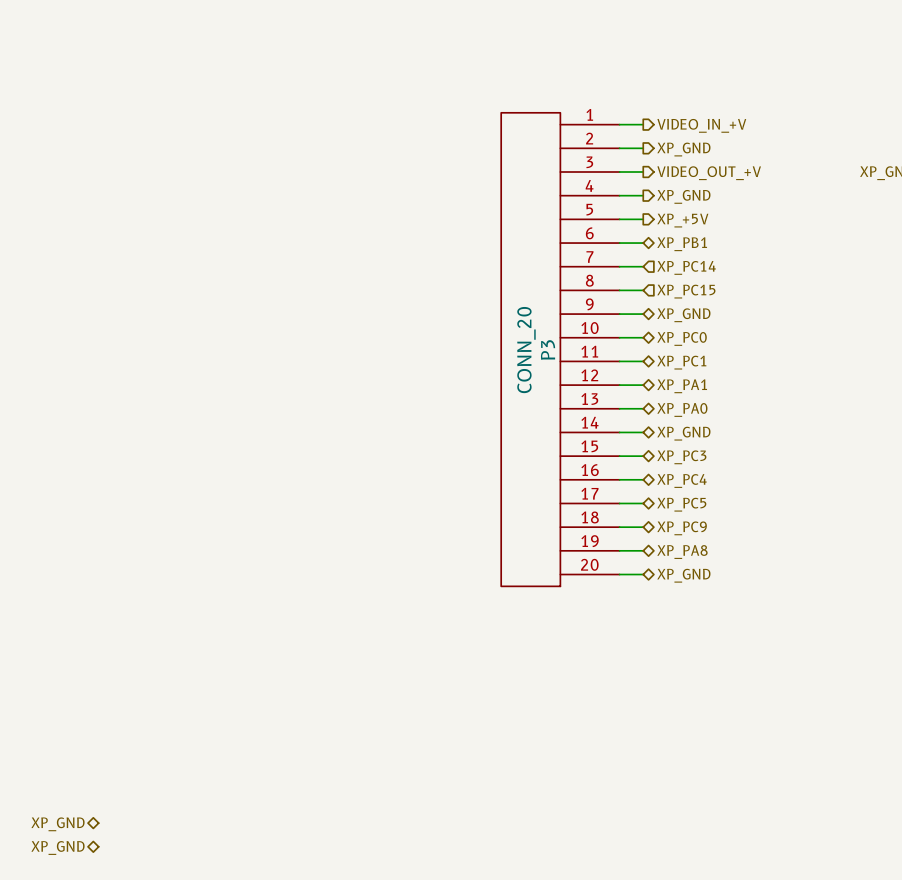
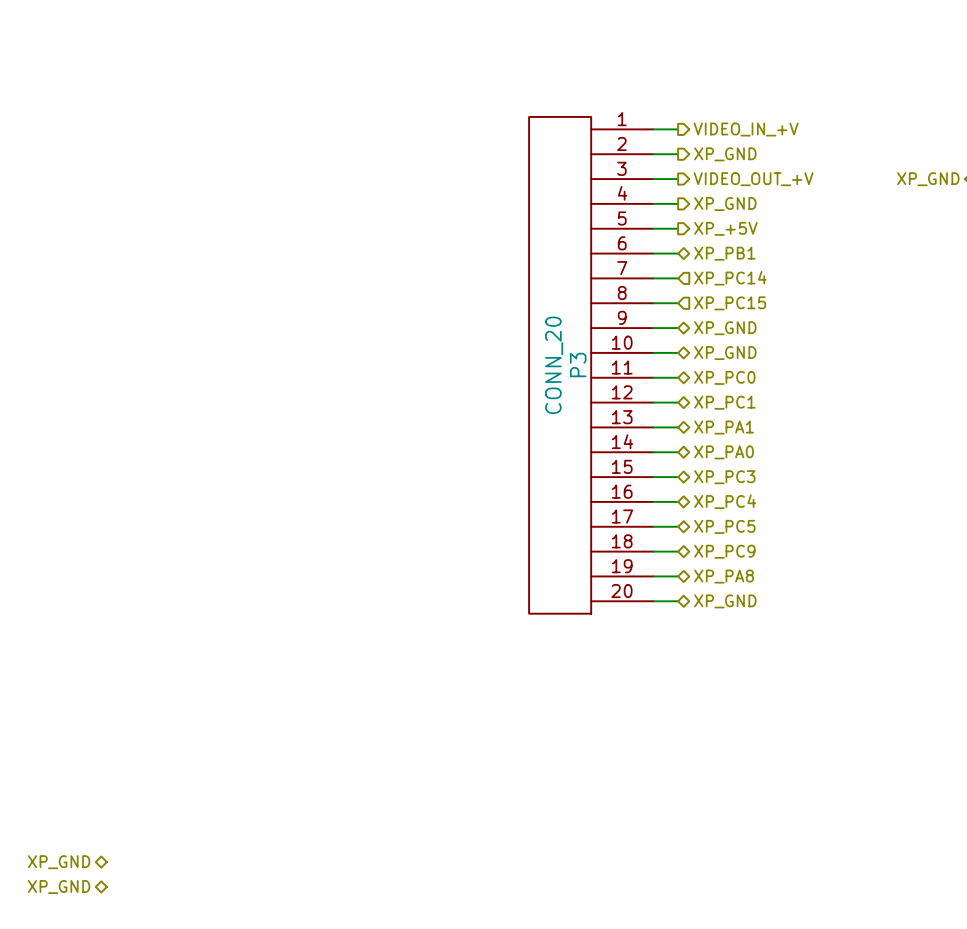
hierarchical label: XP_PC0 (682, 338) -> XP_GND (725, 353)
hierarchical label: XP_PC1 (681, 362) -> XP_PC0 (724, 377)
hierarchical label: XP_PA1 (682, 386) -> XP_PC1 (724, 402)
hierarchical label: XP_PA0 (682, 409) -> XP_PA1 (724, 427)
hierarchical label: XP_GND (683, 433) -> XP_PA0 (724, 452)

